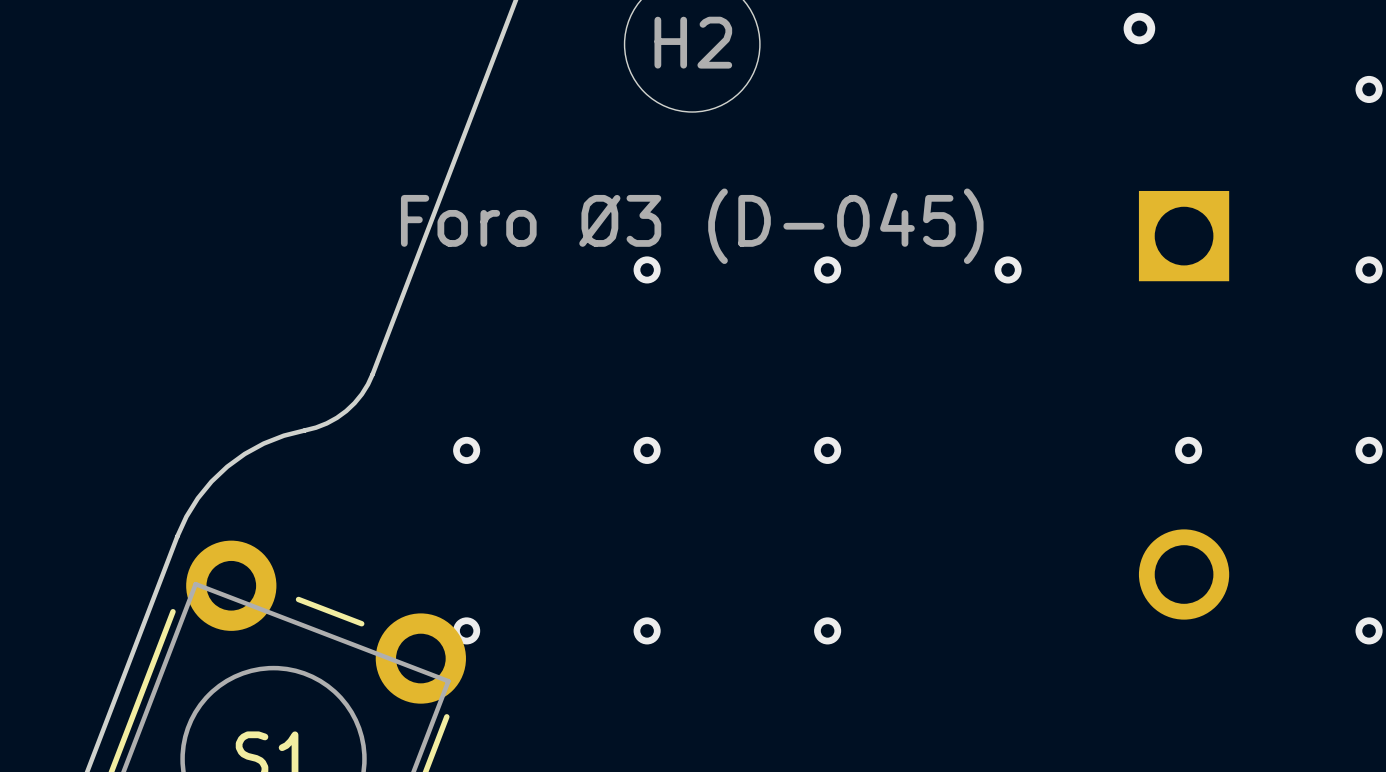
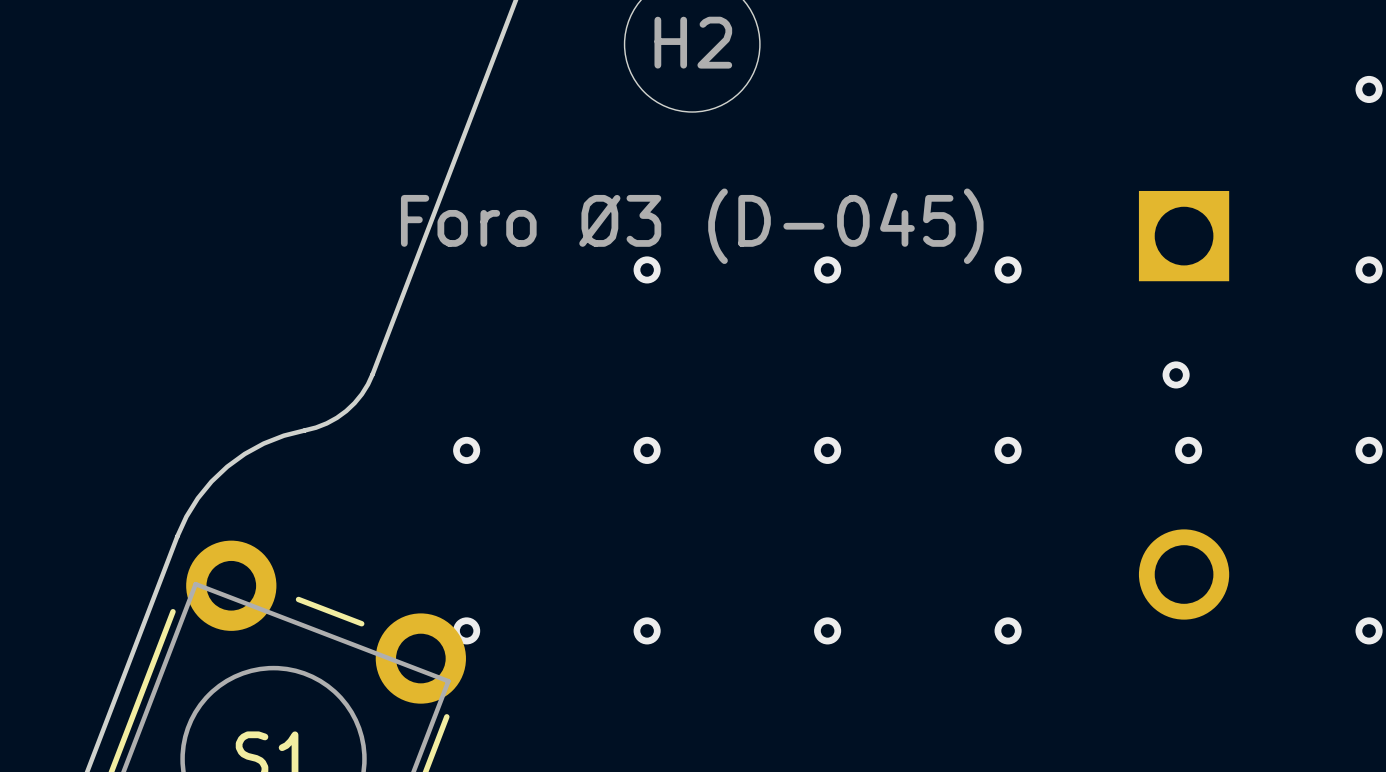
via: (1139, 28) -> none
via: none -> (1176, 374)
via: none -> (1008, 450)
via: none -> (1008, 630)

